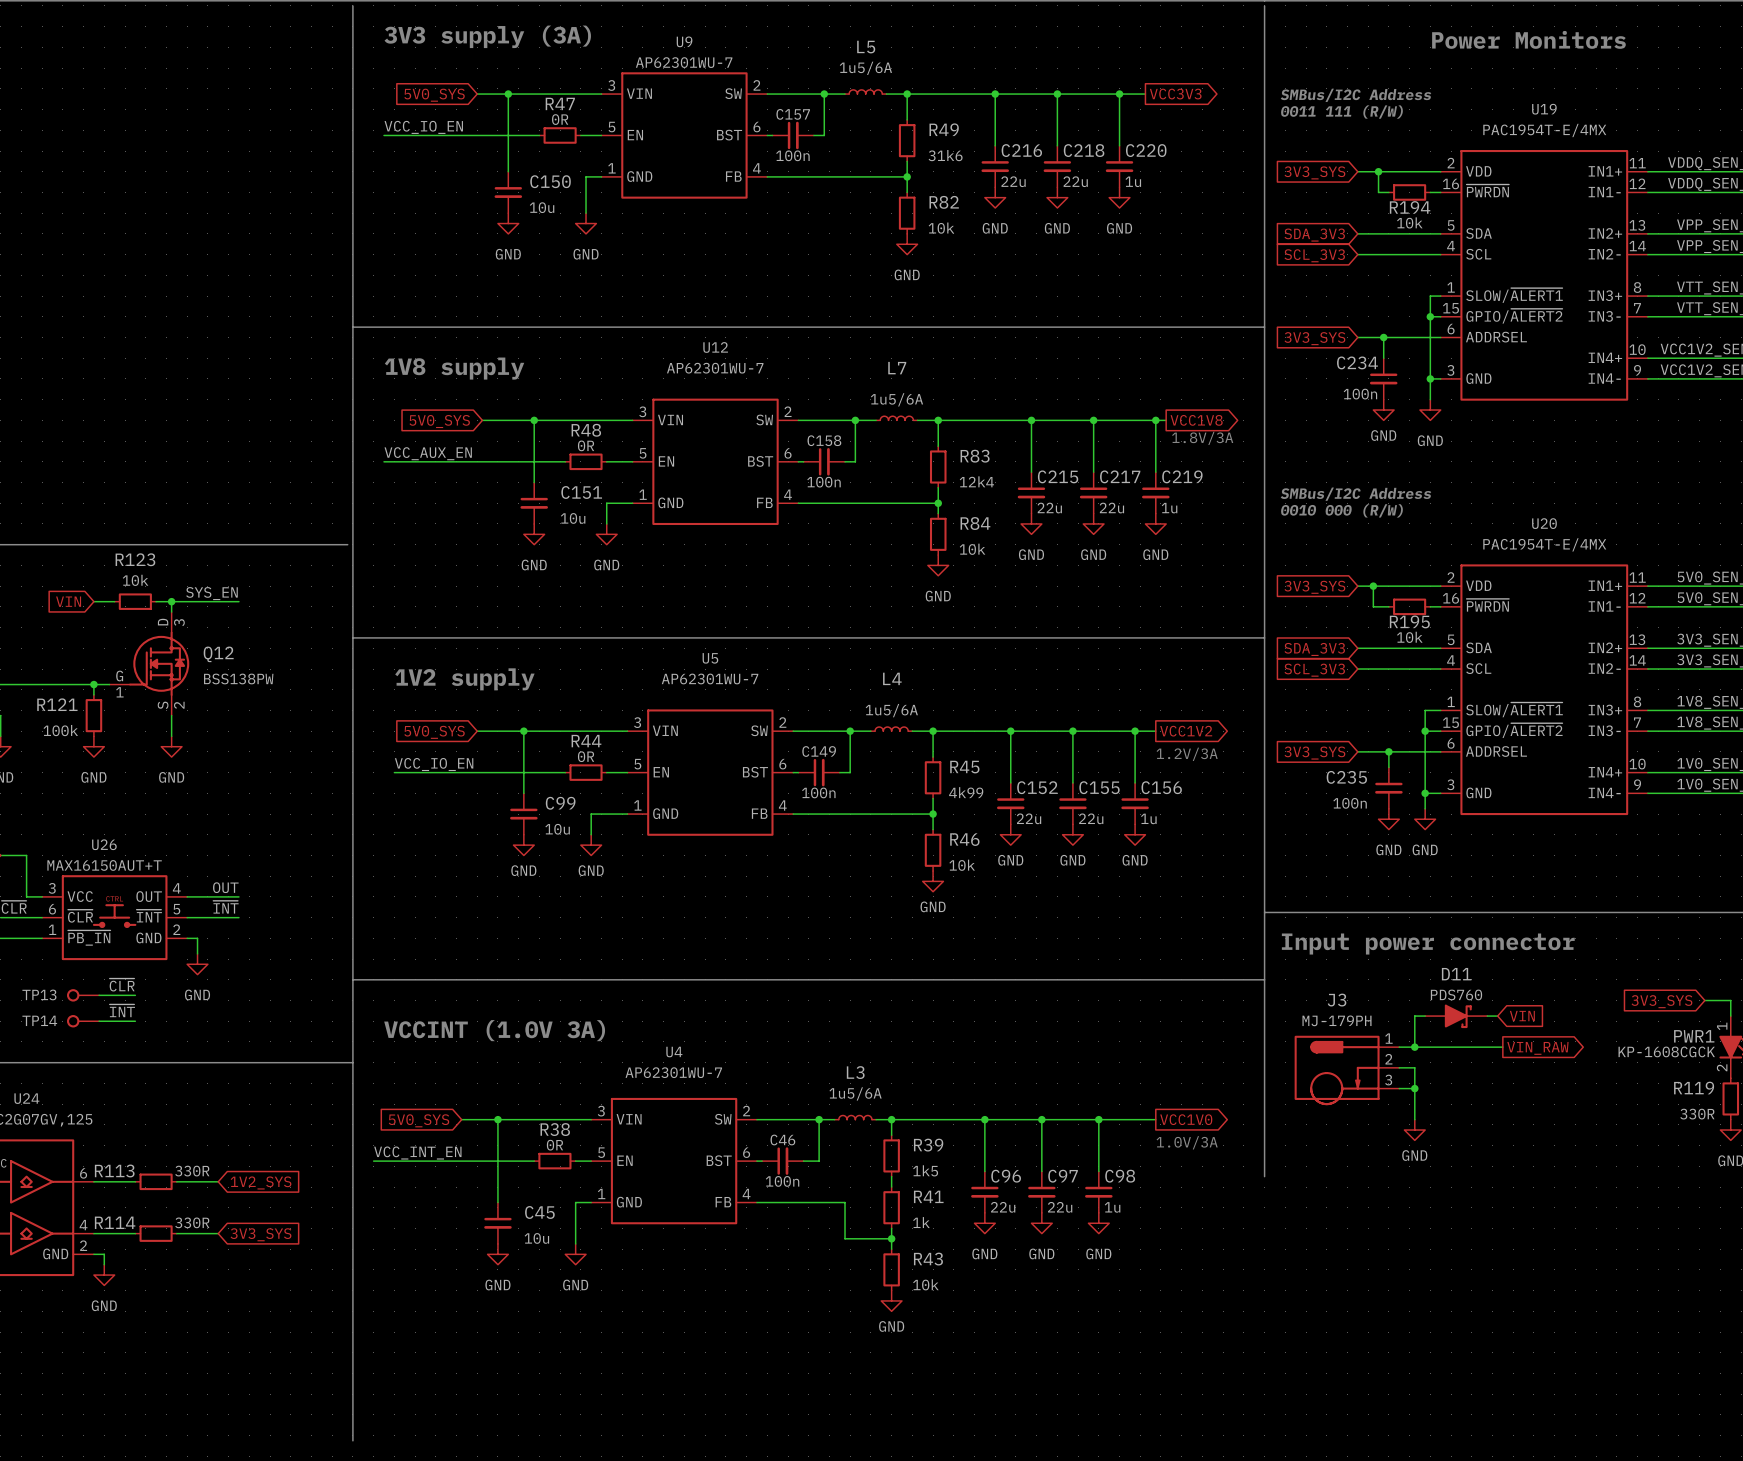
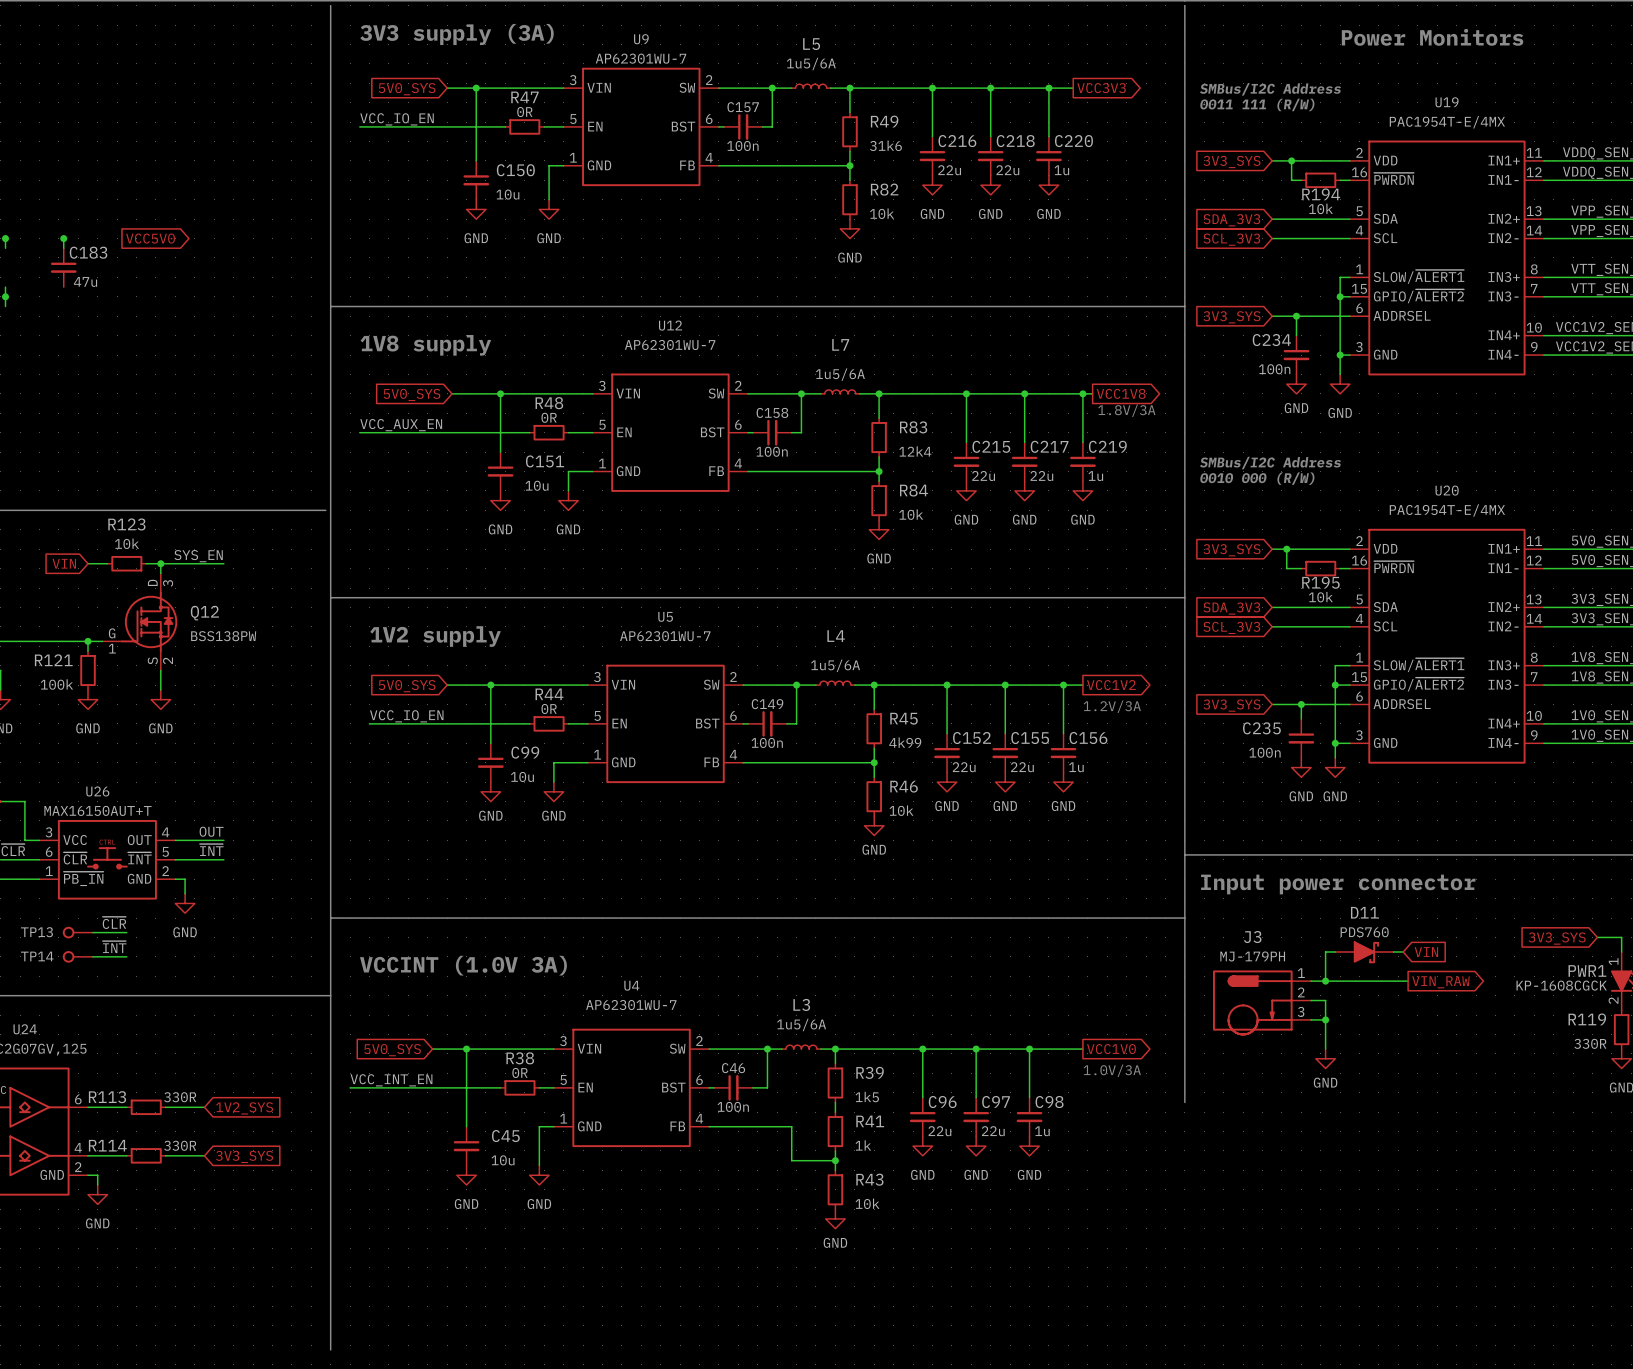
wire: none -> (5, 238) (5, 248)
junction: none -> (5, 238)
wire: none -> (63, 238) (63, 248)
junction: none -> (63, 238)
global label: none -> VCC5V0 (150, 238)
C183: none -> (63, 267)
wire: none -> (5, 287) (5, 306)
junction: none -> (5, 296)

